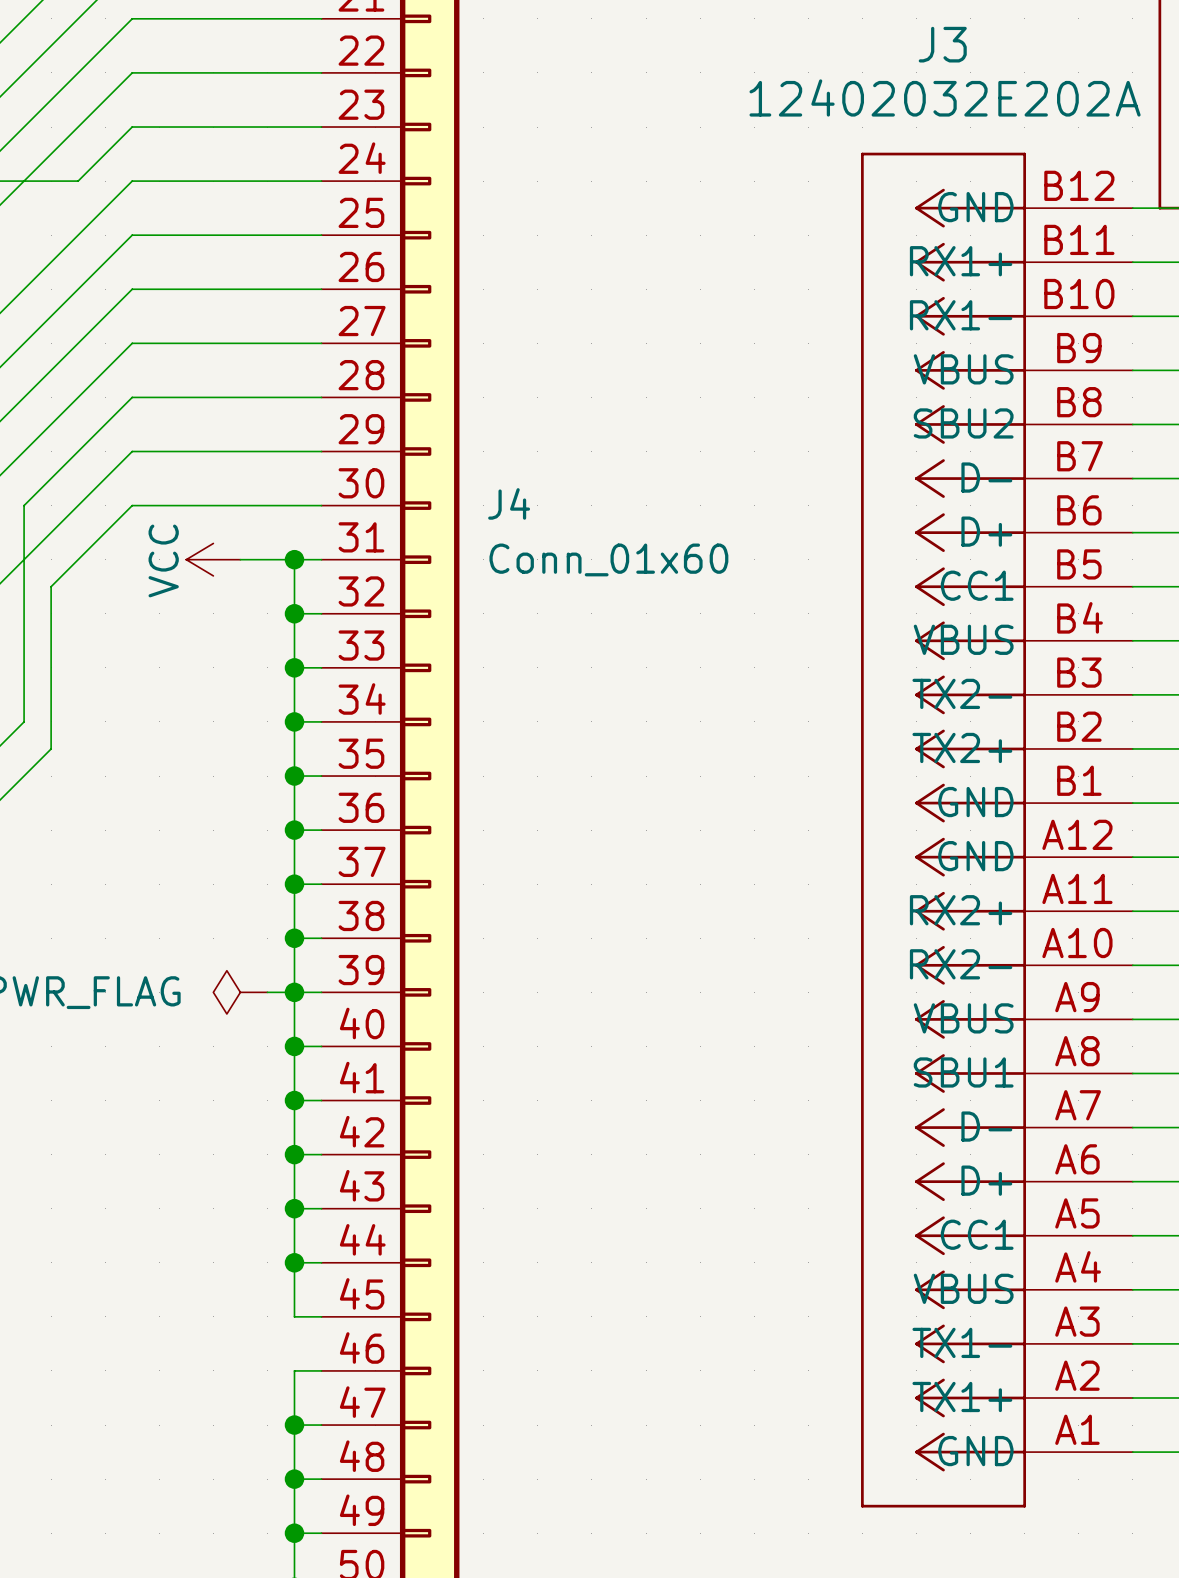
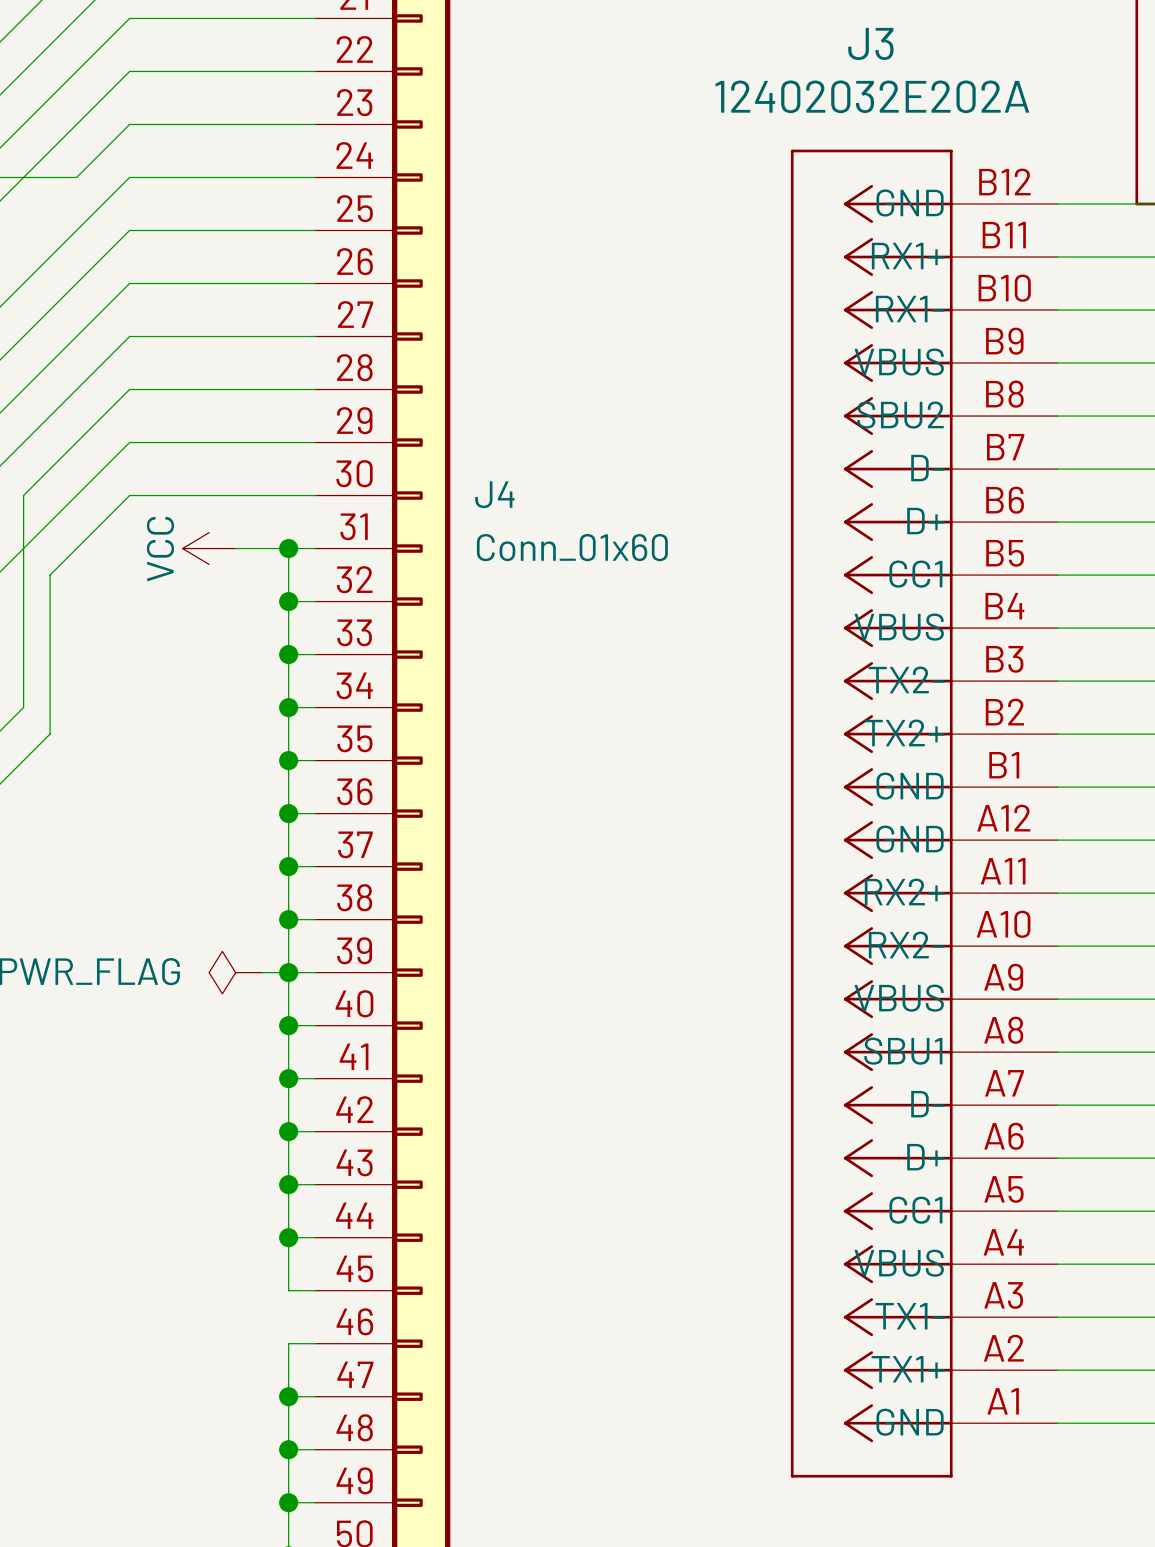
J3 position: (996, 830) -> (924, 813)

